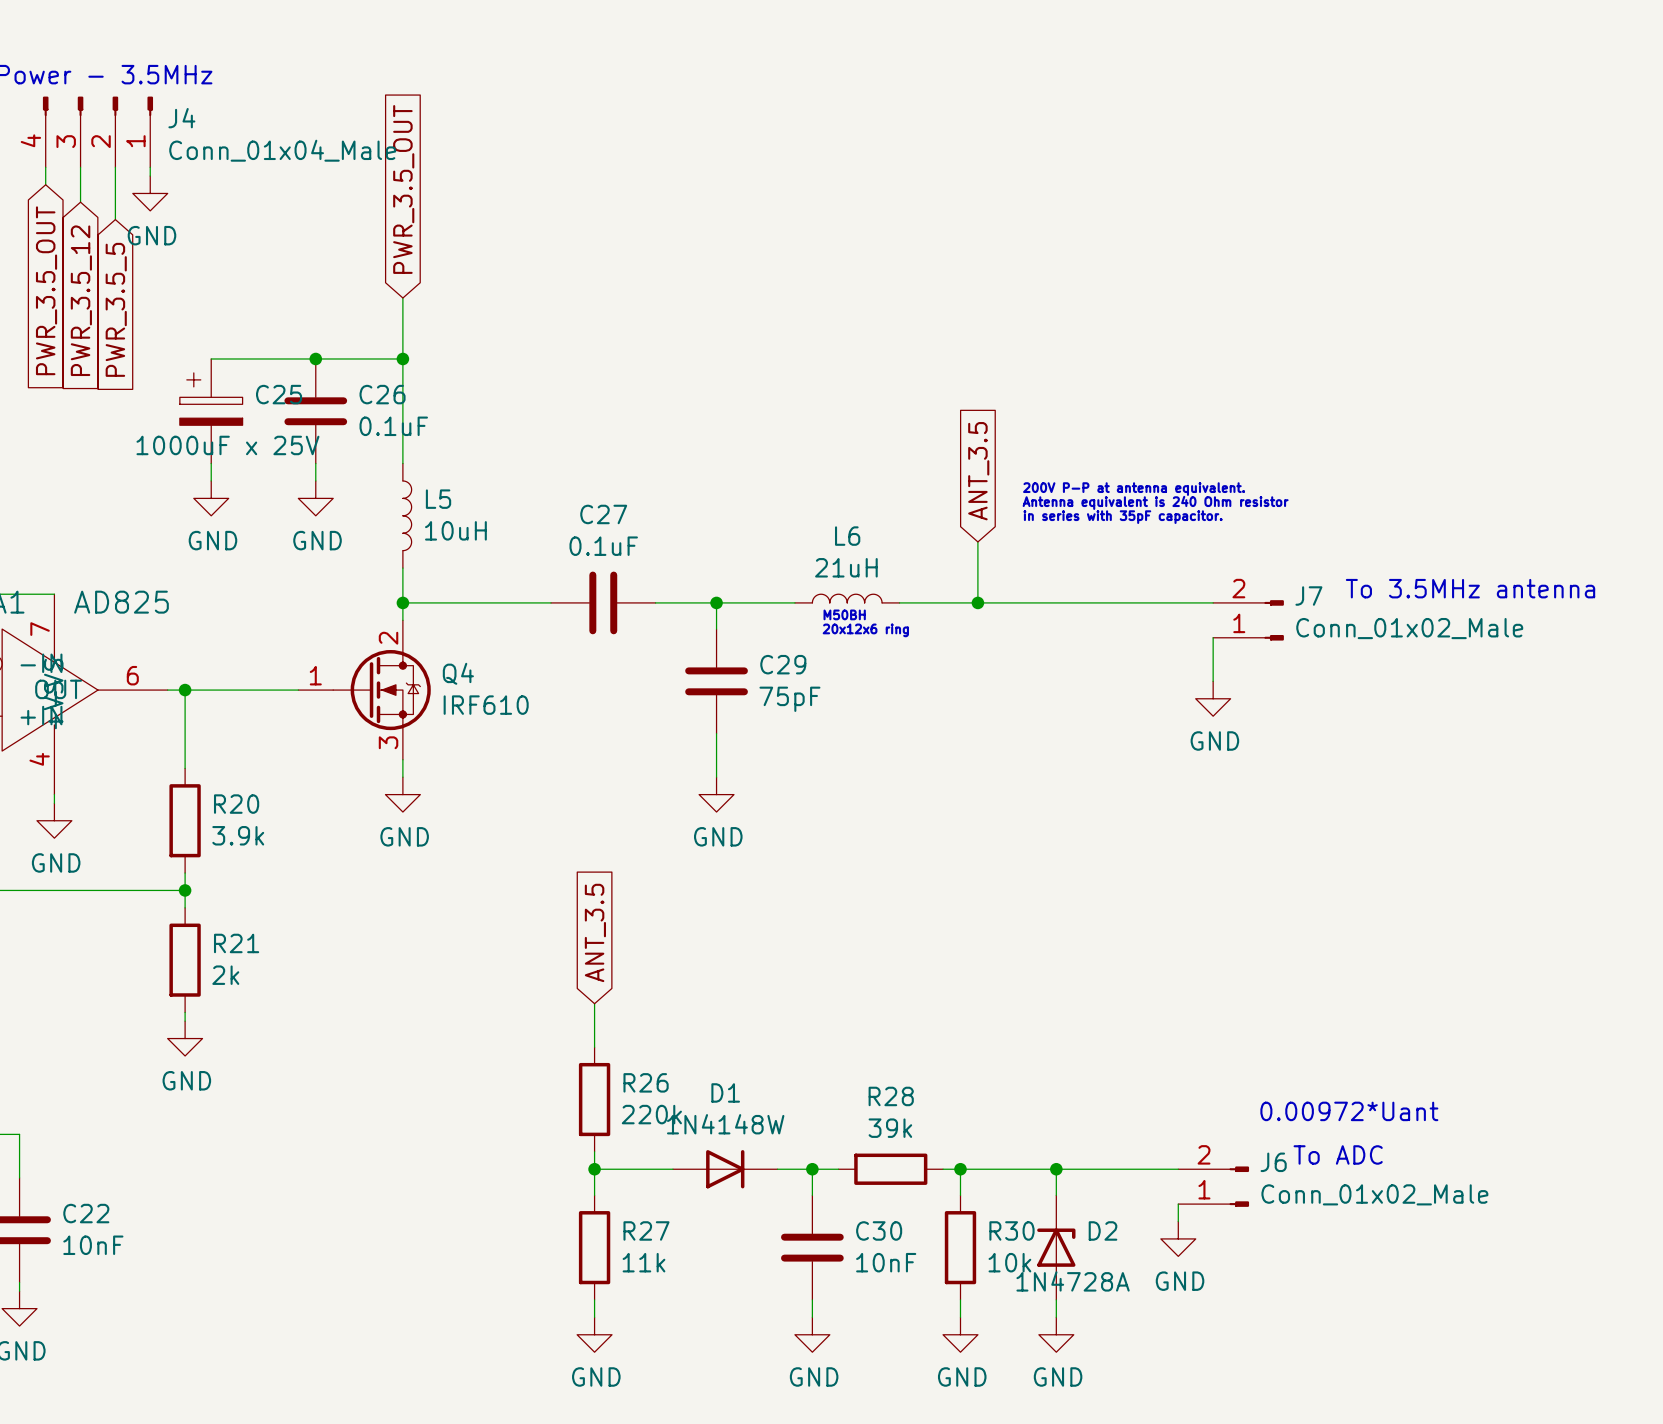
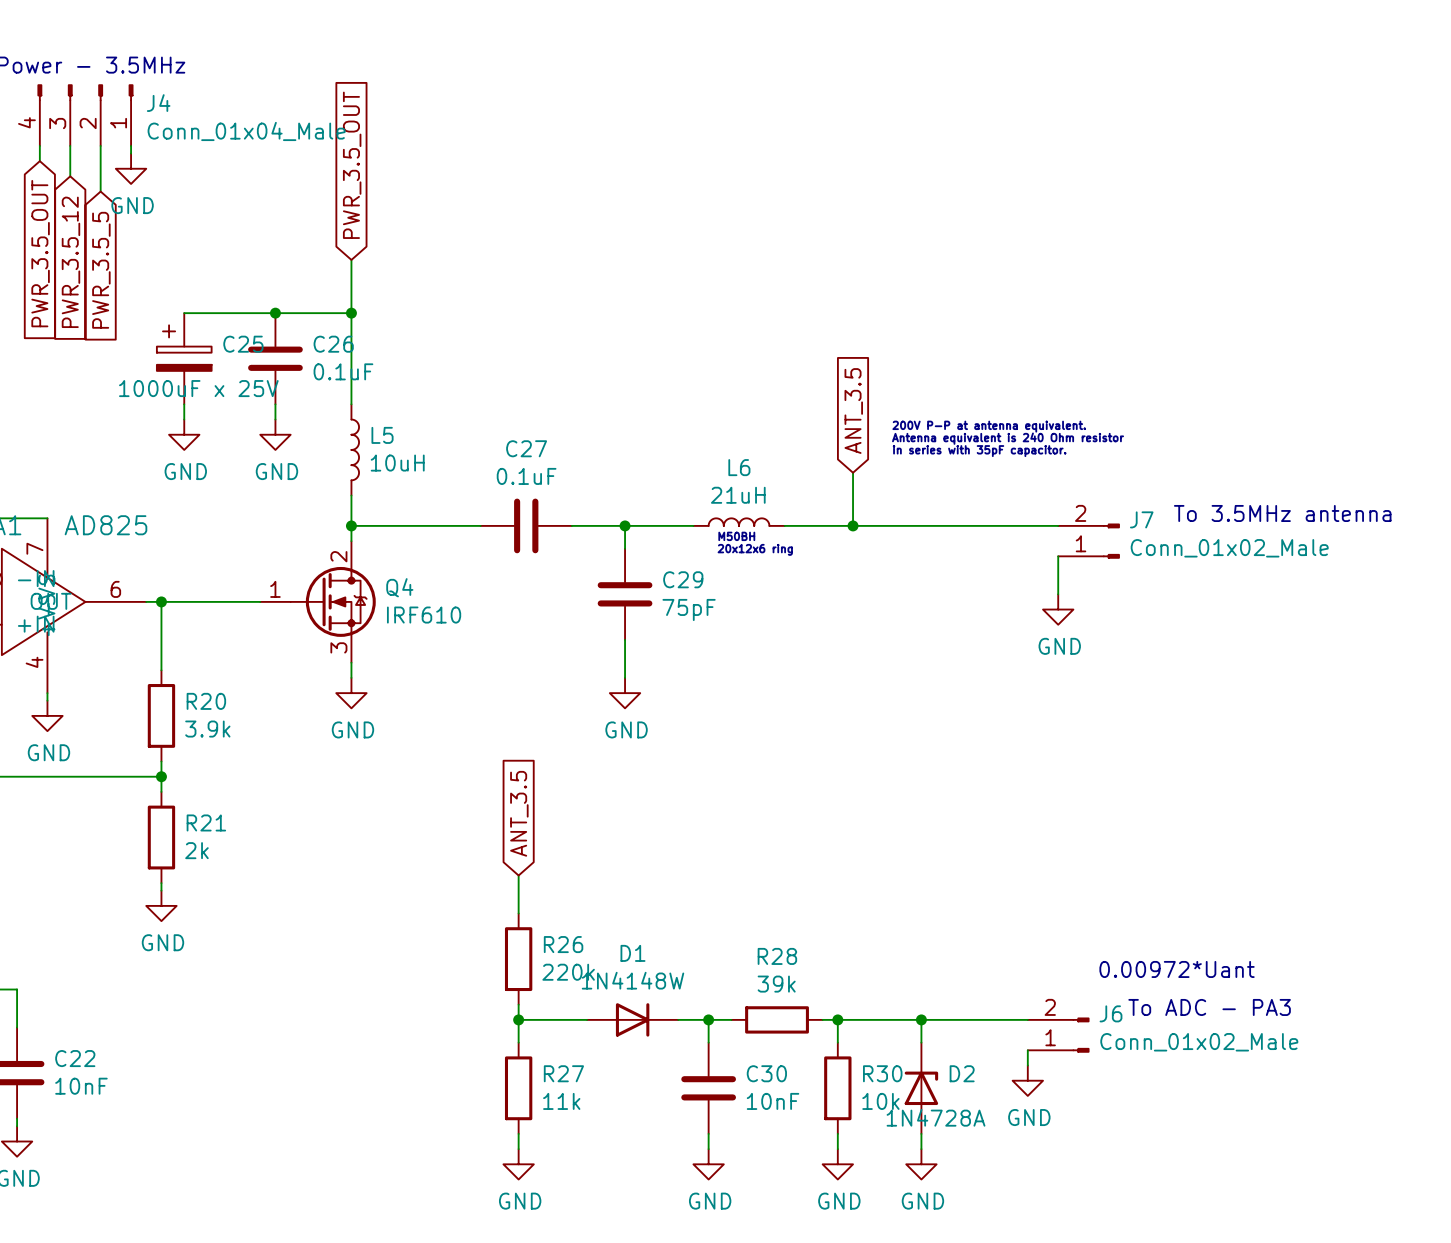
text: To ADC (1338, 1154) -> To ADC - PA3 (1209, 1007)

